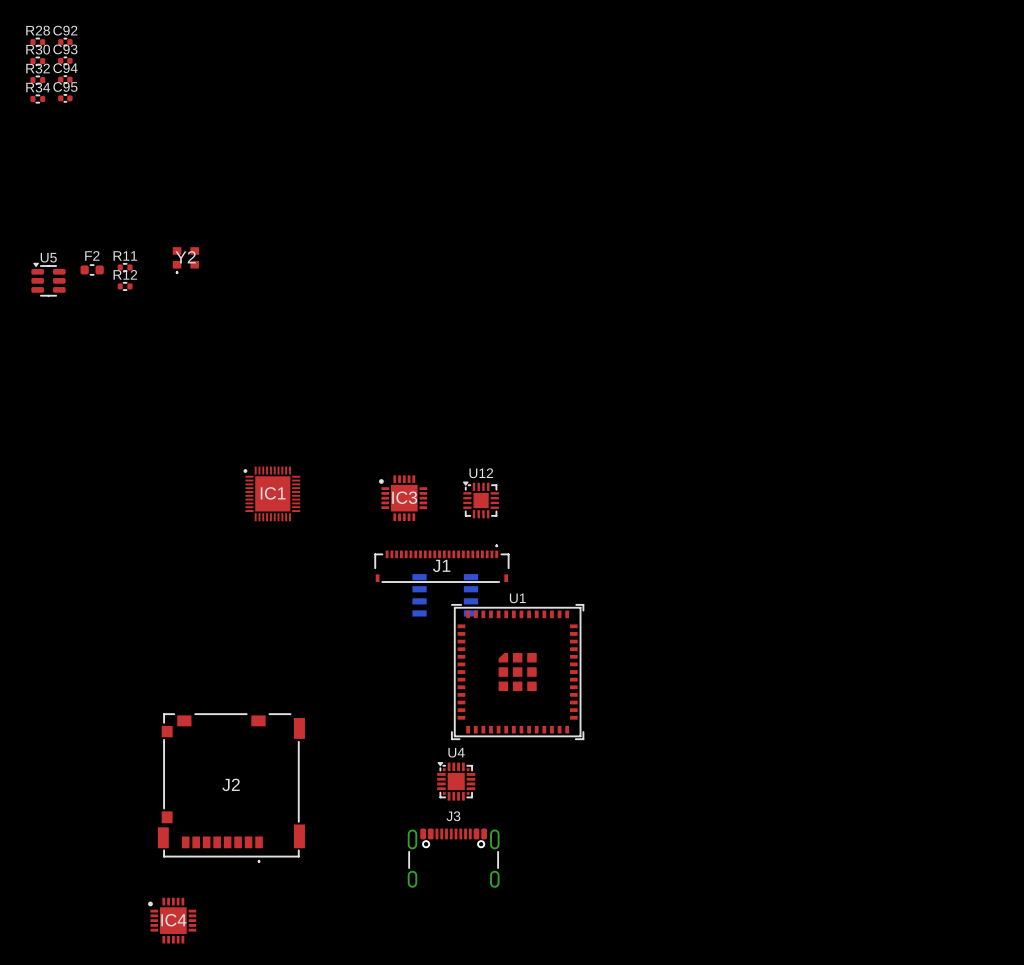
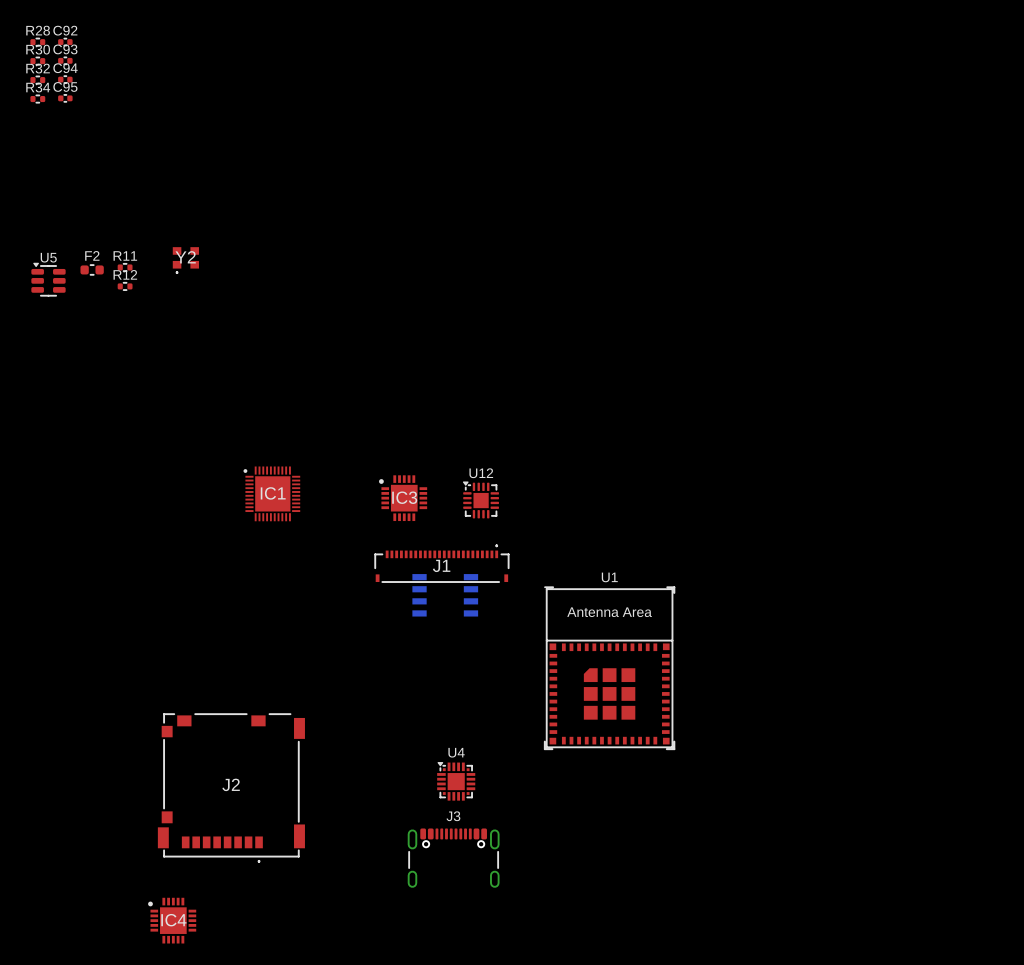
U1 footprint: [451, 604, 584, 740] -> [544, 586, 675, 750]

